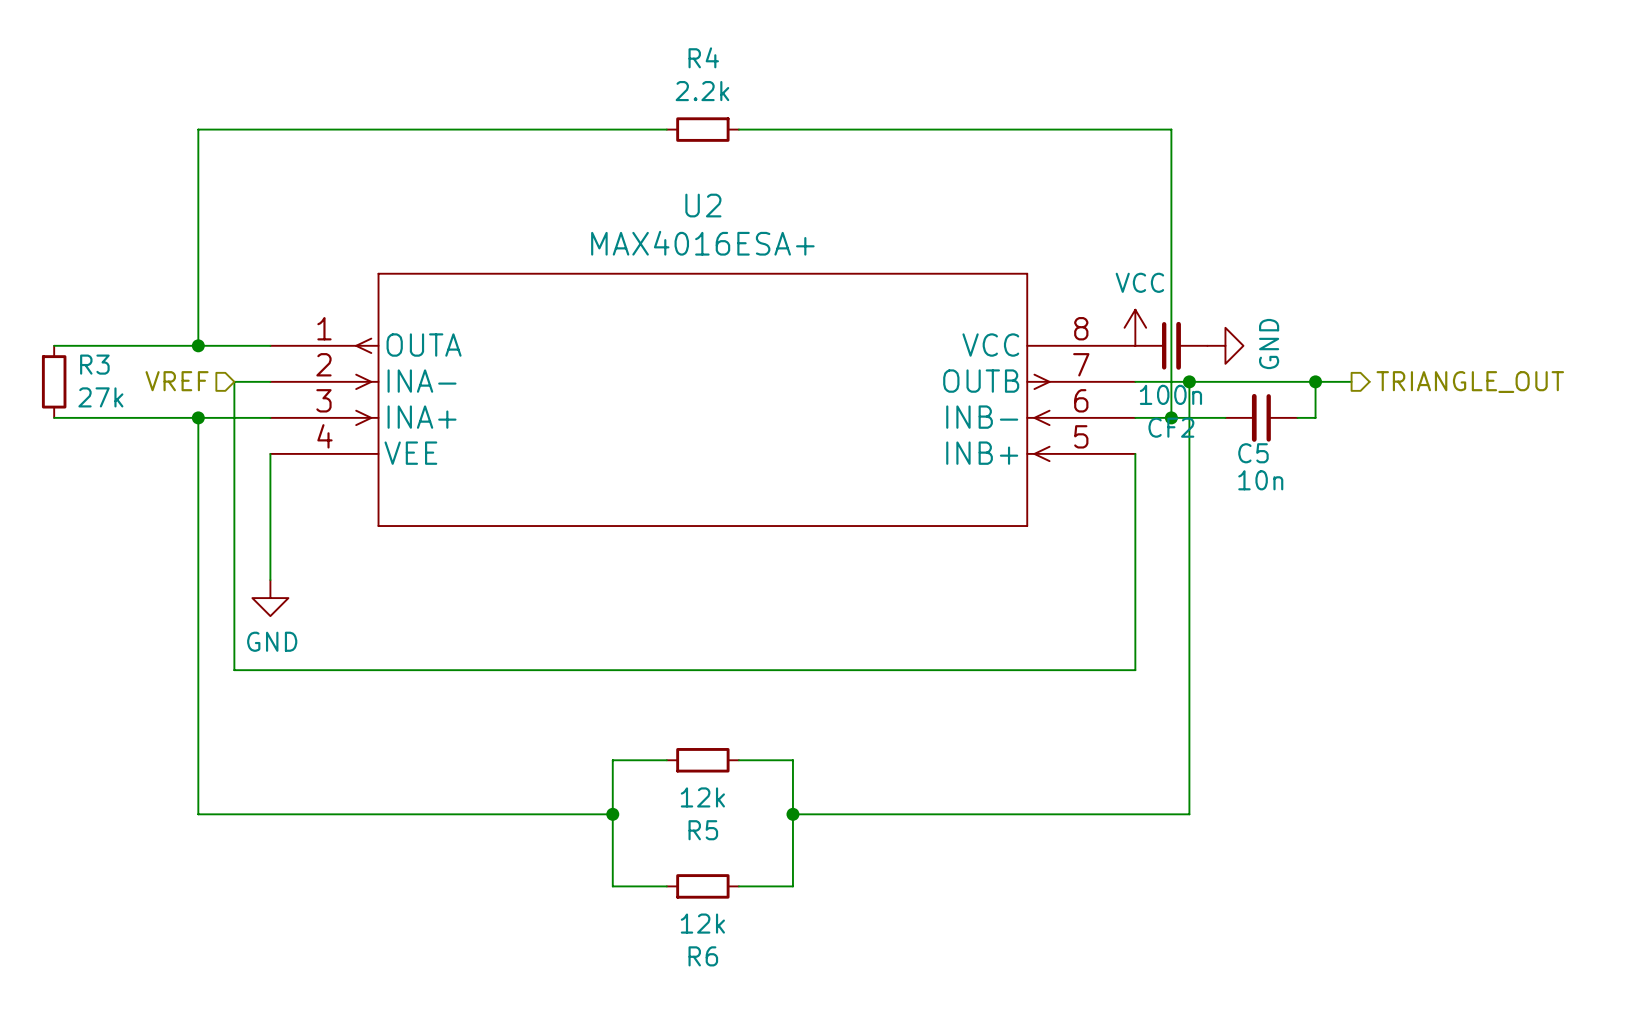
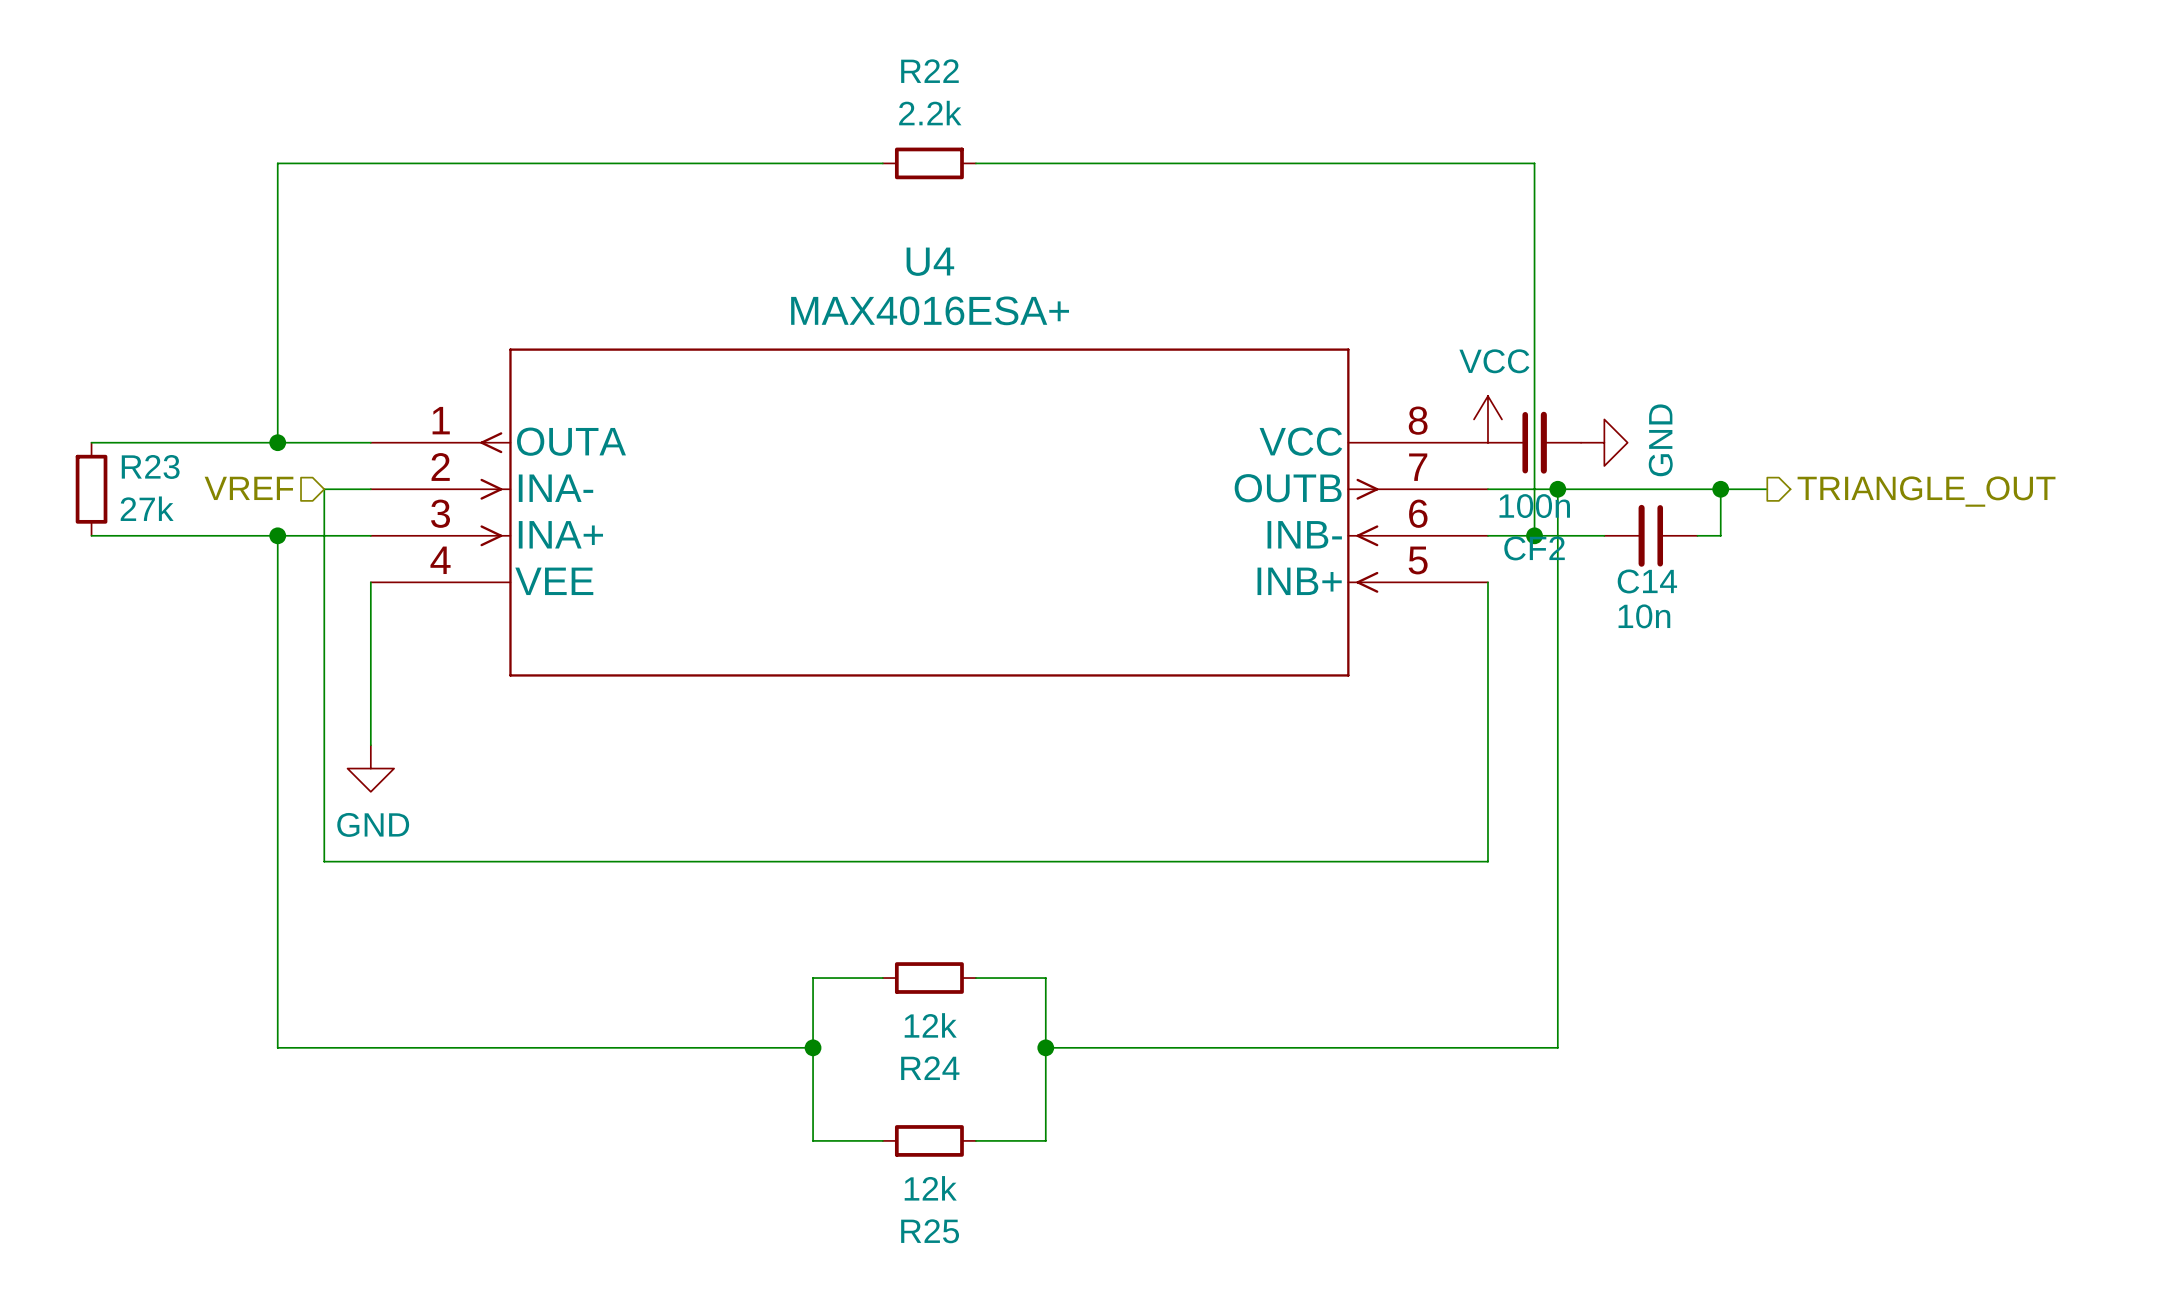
R4 name: R4 (703, 57) -> R22 (929, 71)
U2 name: U2 (703, 205) -> U4 (930, 261)
R3 name: R3 (94, 364) -> R23 (150, 466)
C5 name: C5 (1253, 453) -> C14 (1647, 581)
R5 name: R5 (703, 830) -> R24 (930, 1068)
R6 name: R6 (703, 956) -> R25 (930, 1231)

